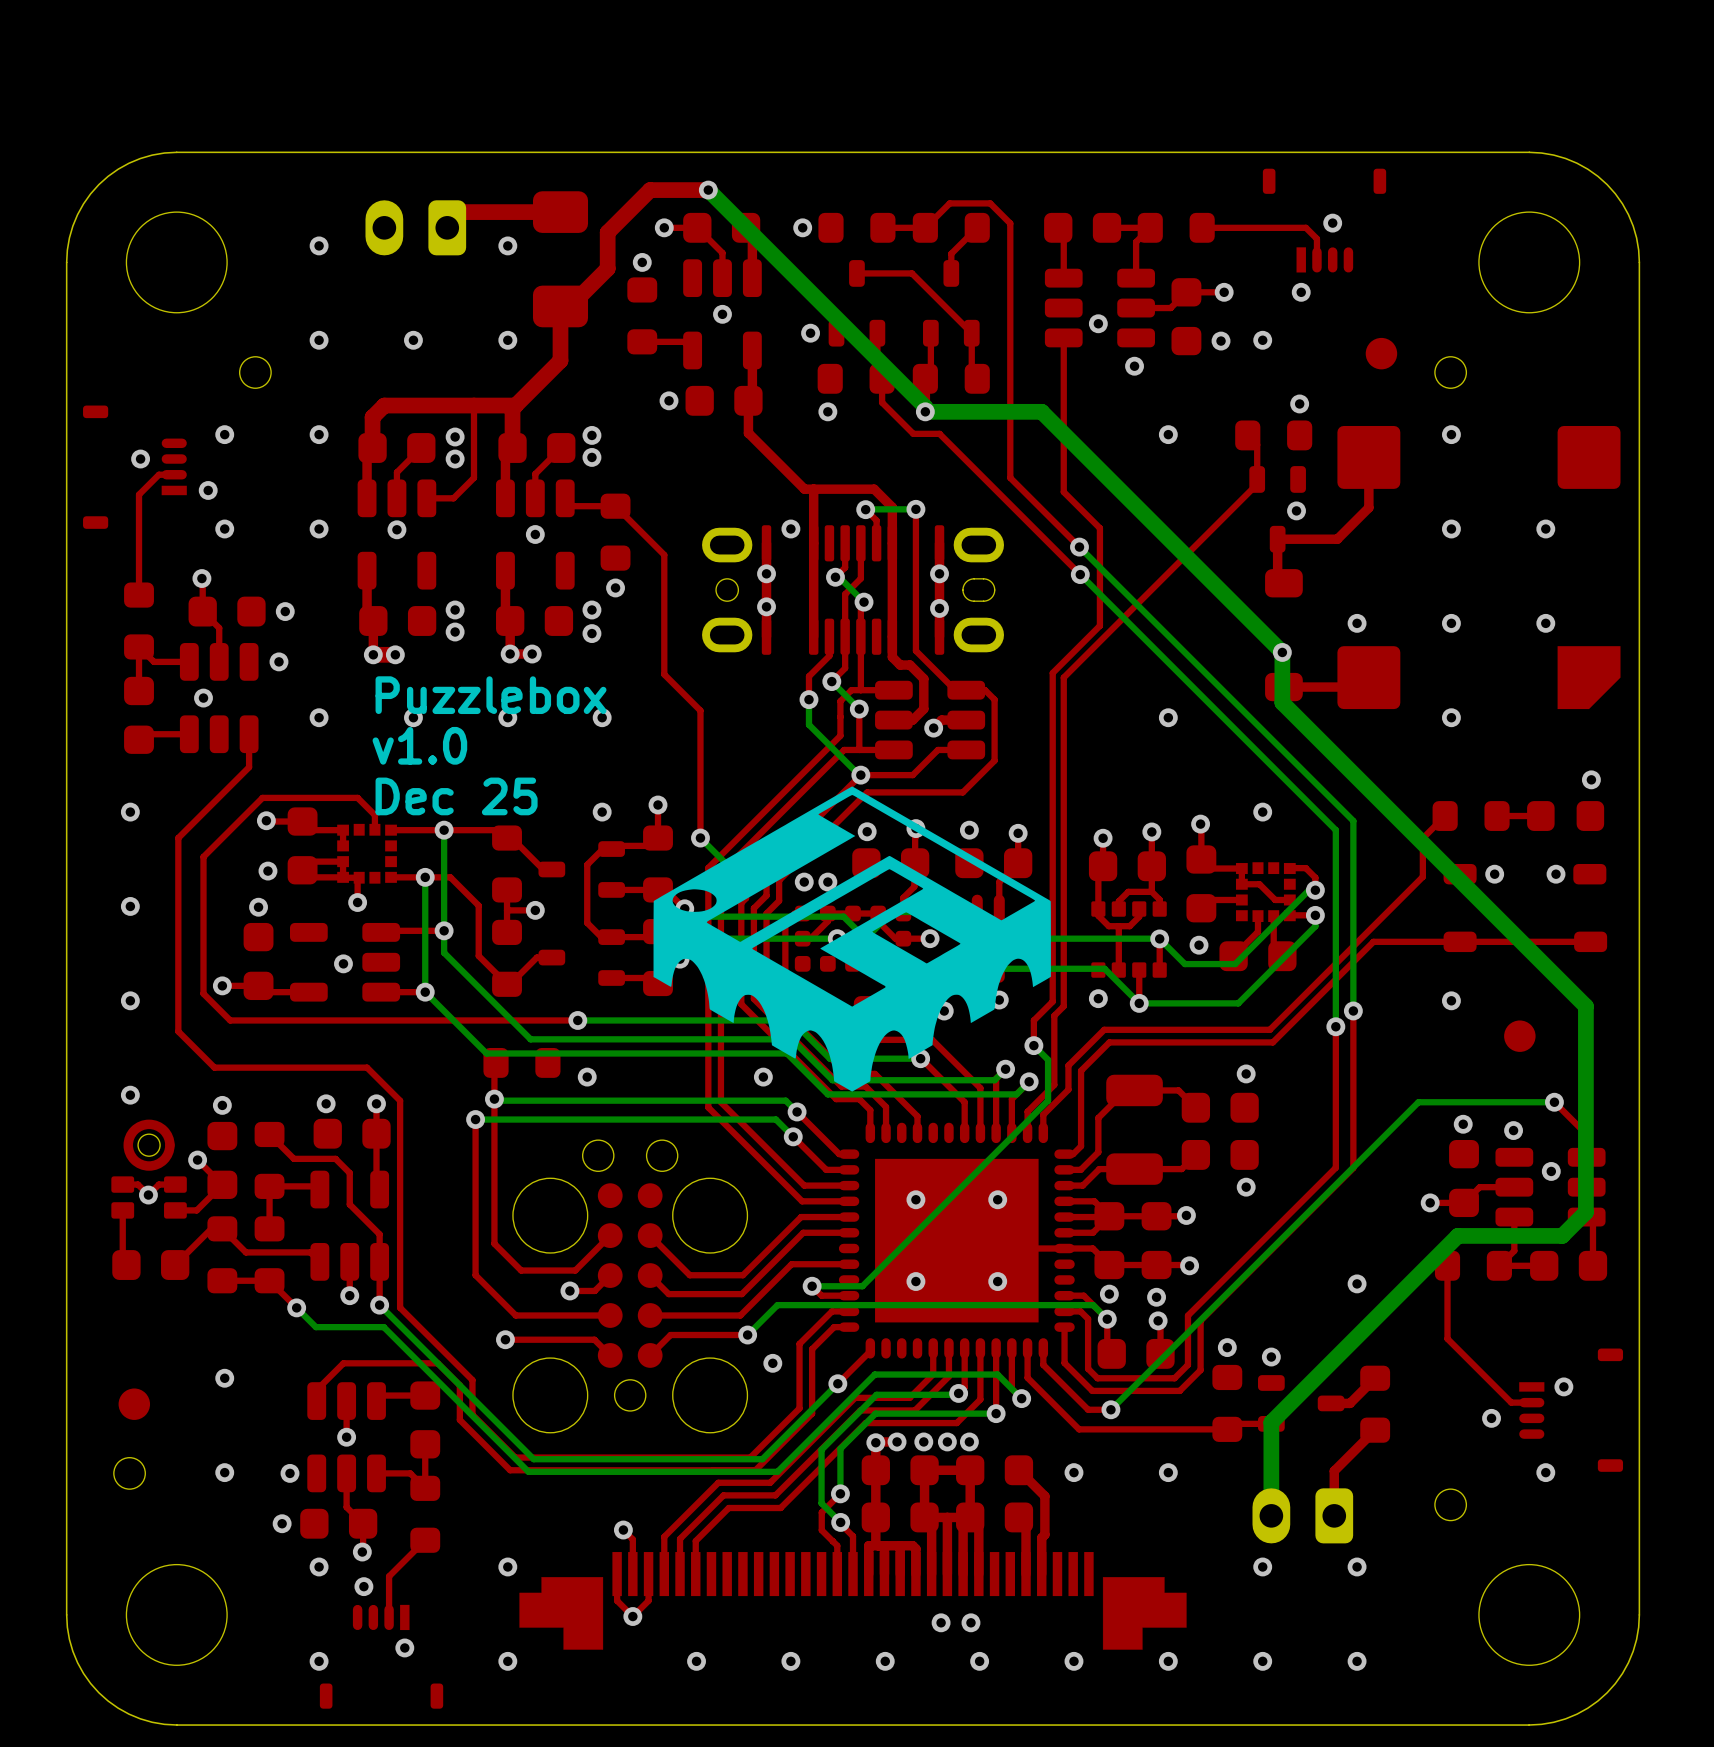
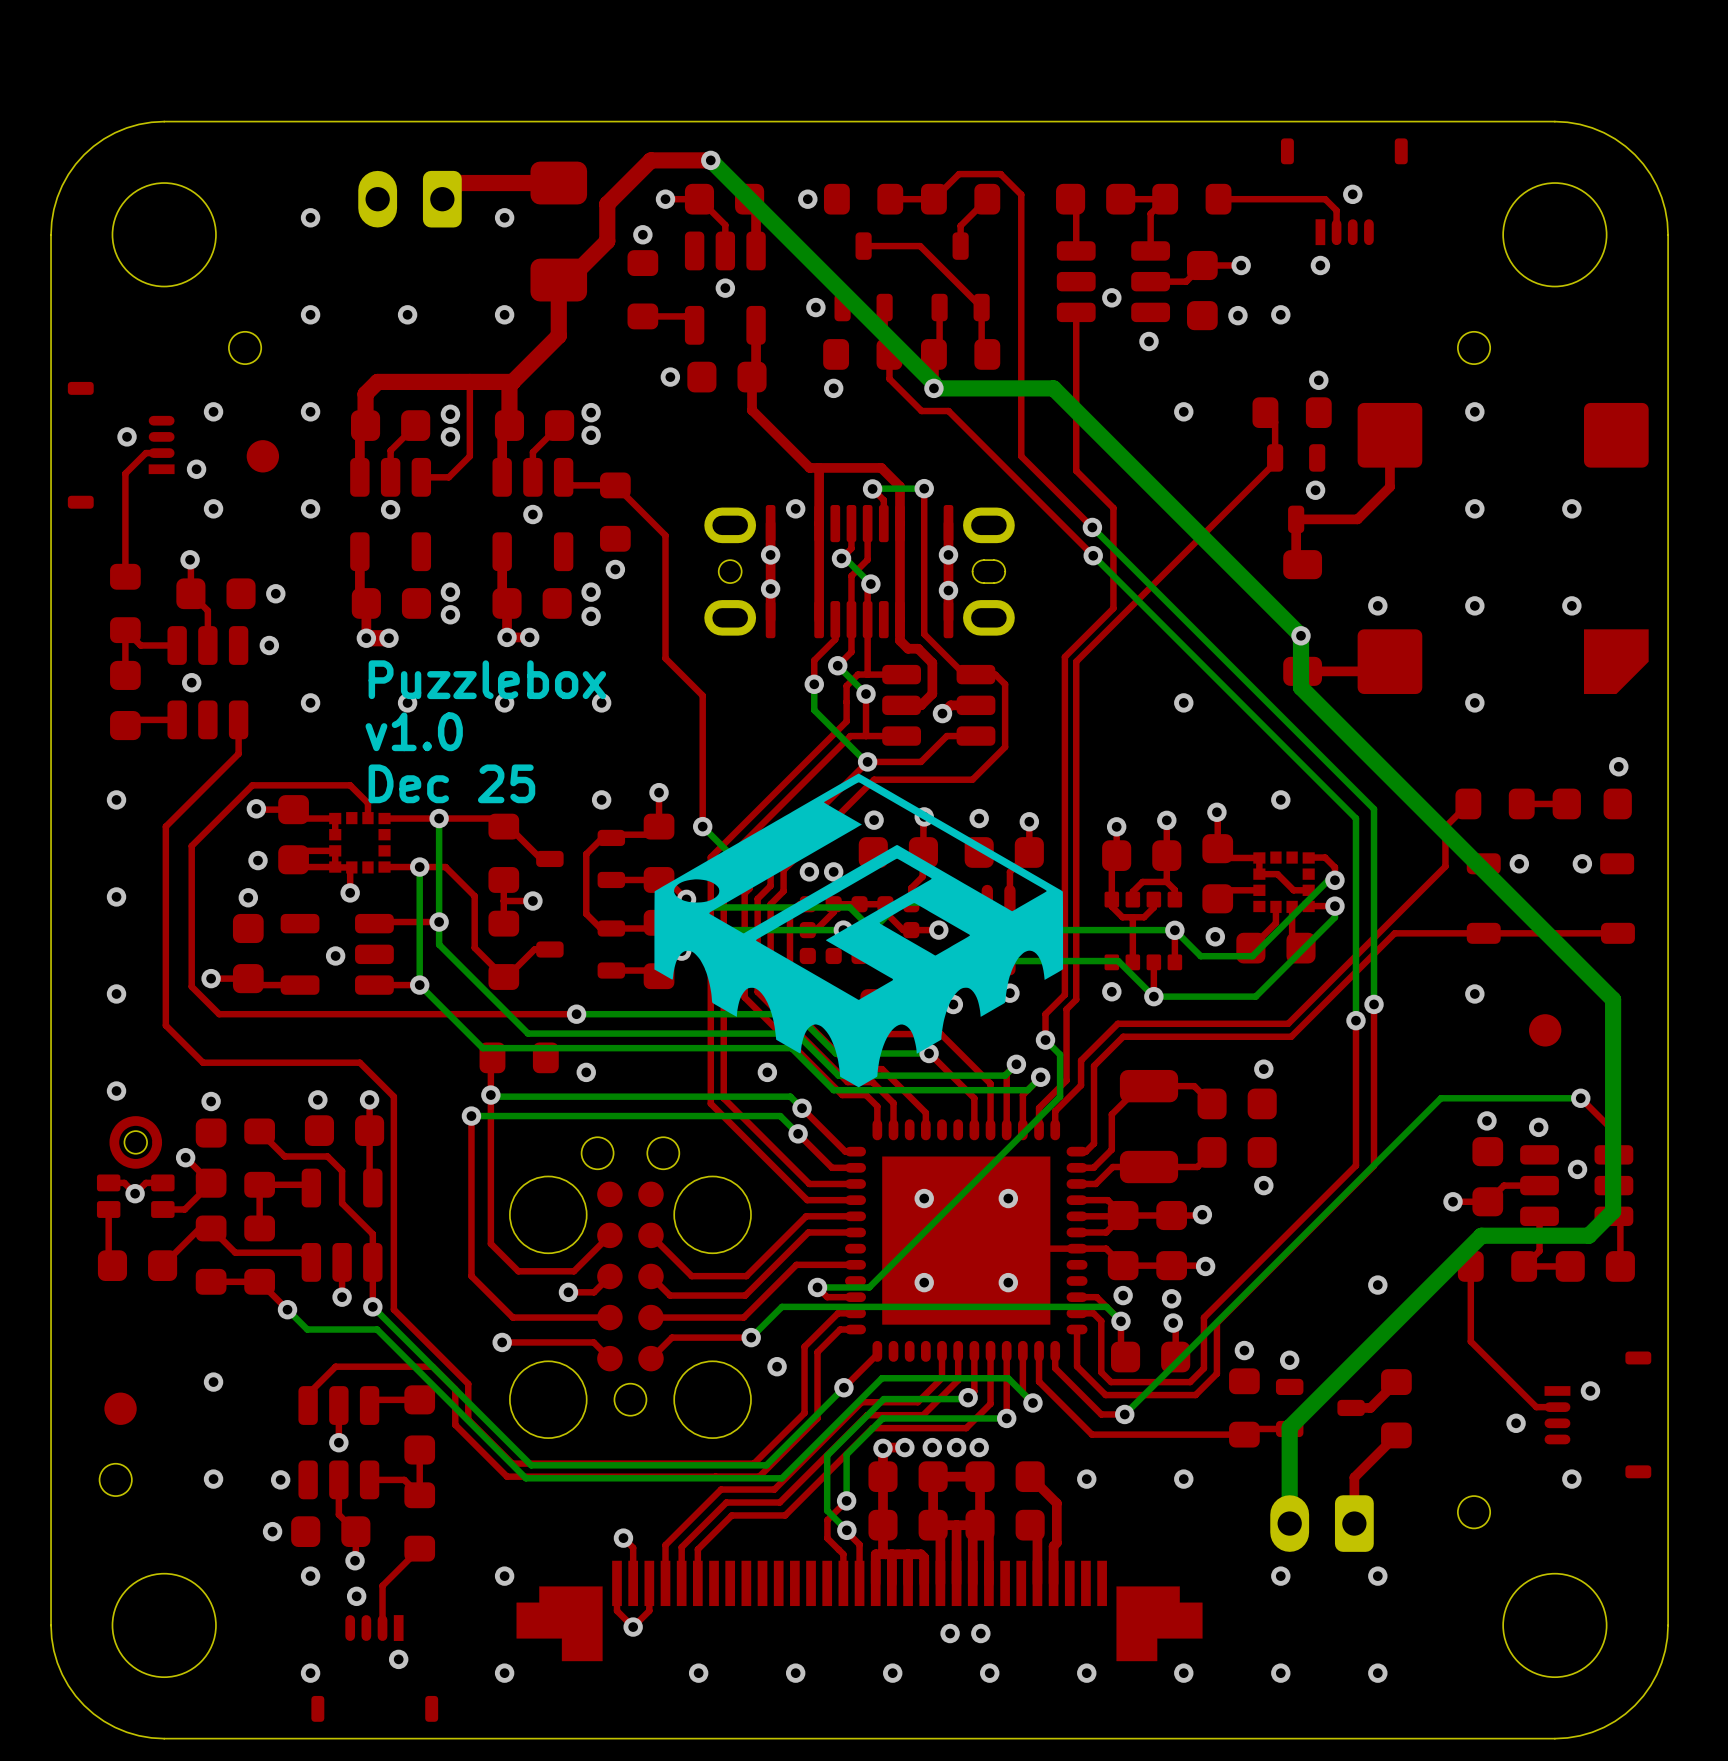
part: (1381, 353) -> none
part: none -> (262, 456)

